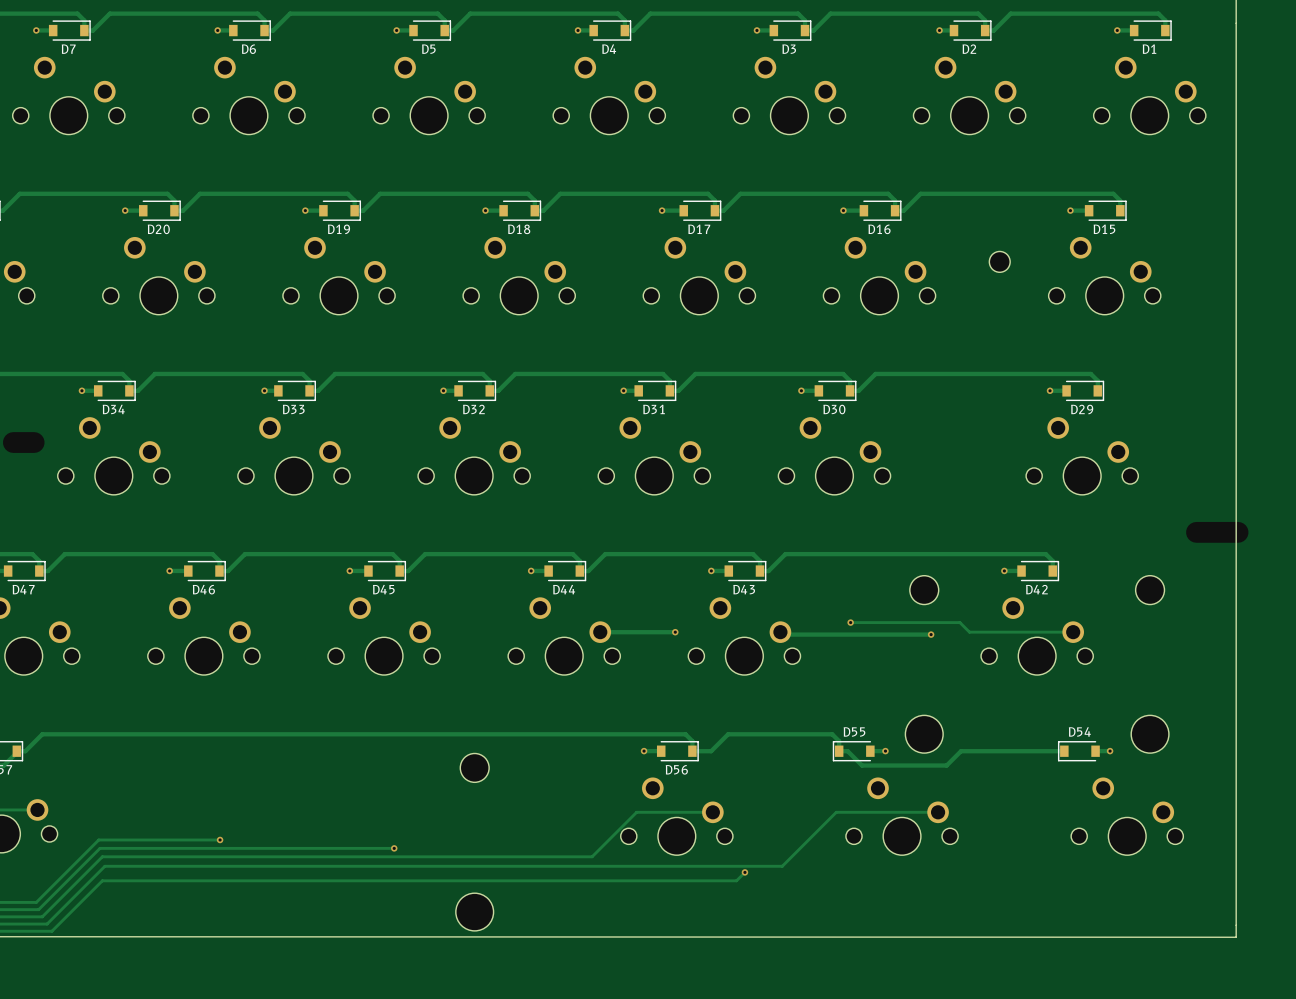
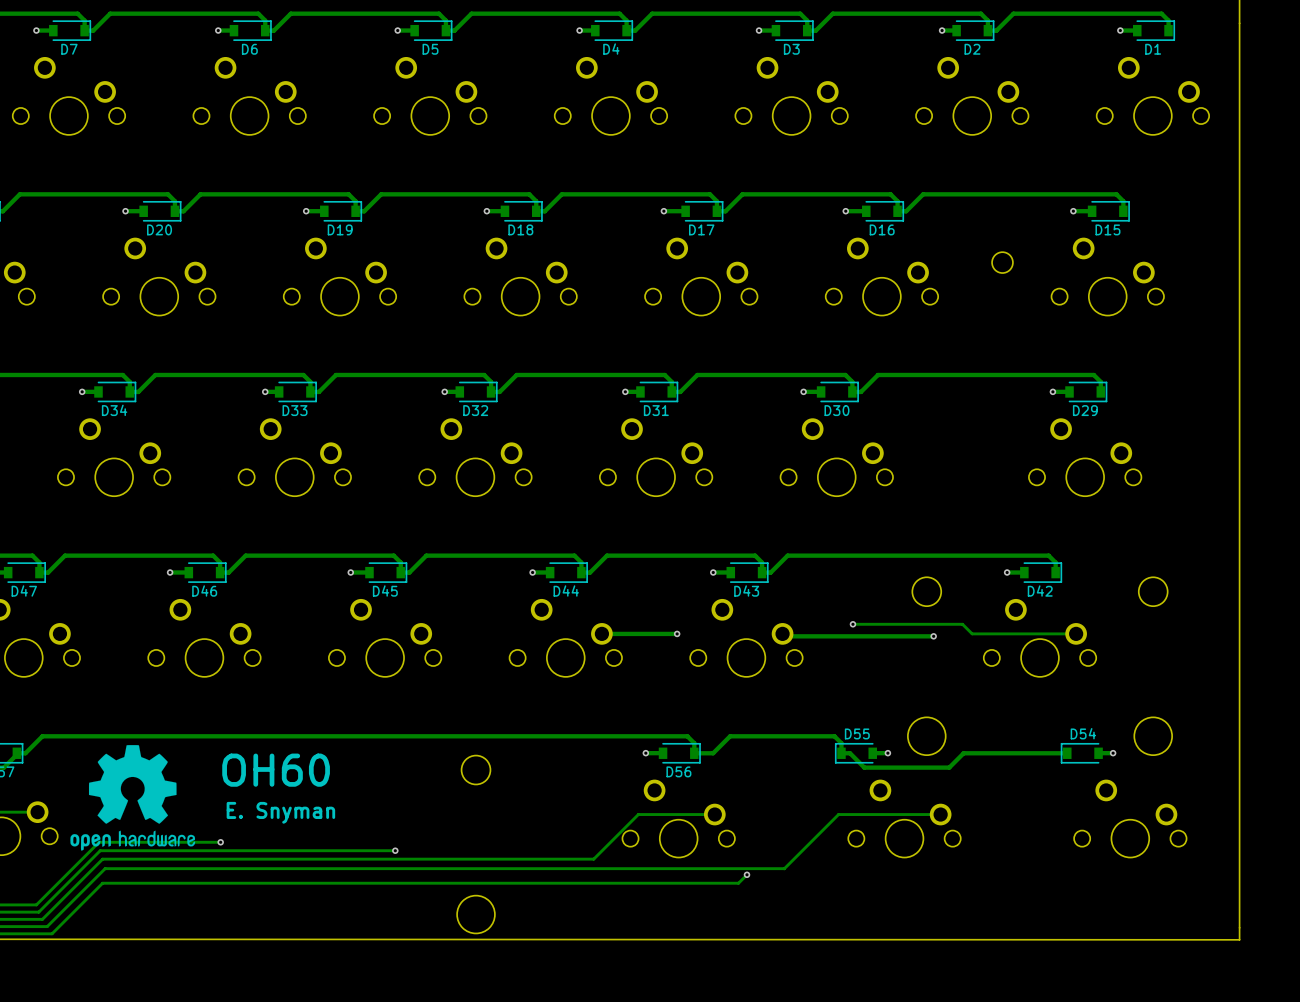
drawing: none -> [70, 745, 196, 851]
text: none -> OH60 (276, 770)
text: none -> E. Snyman (280, 812)

